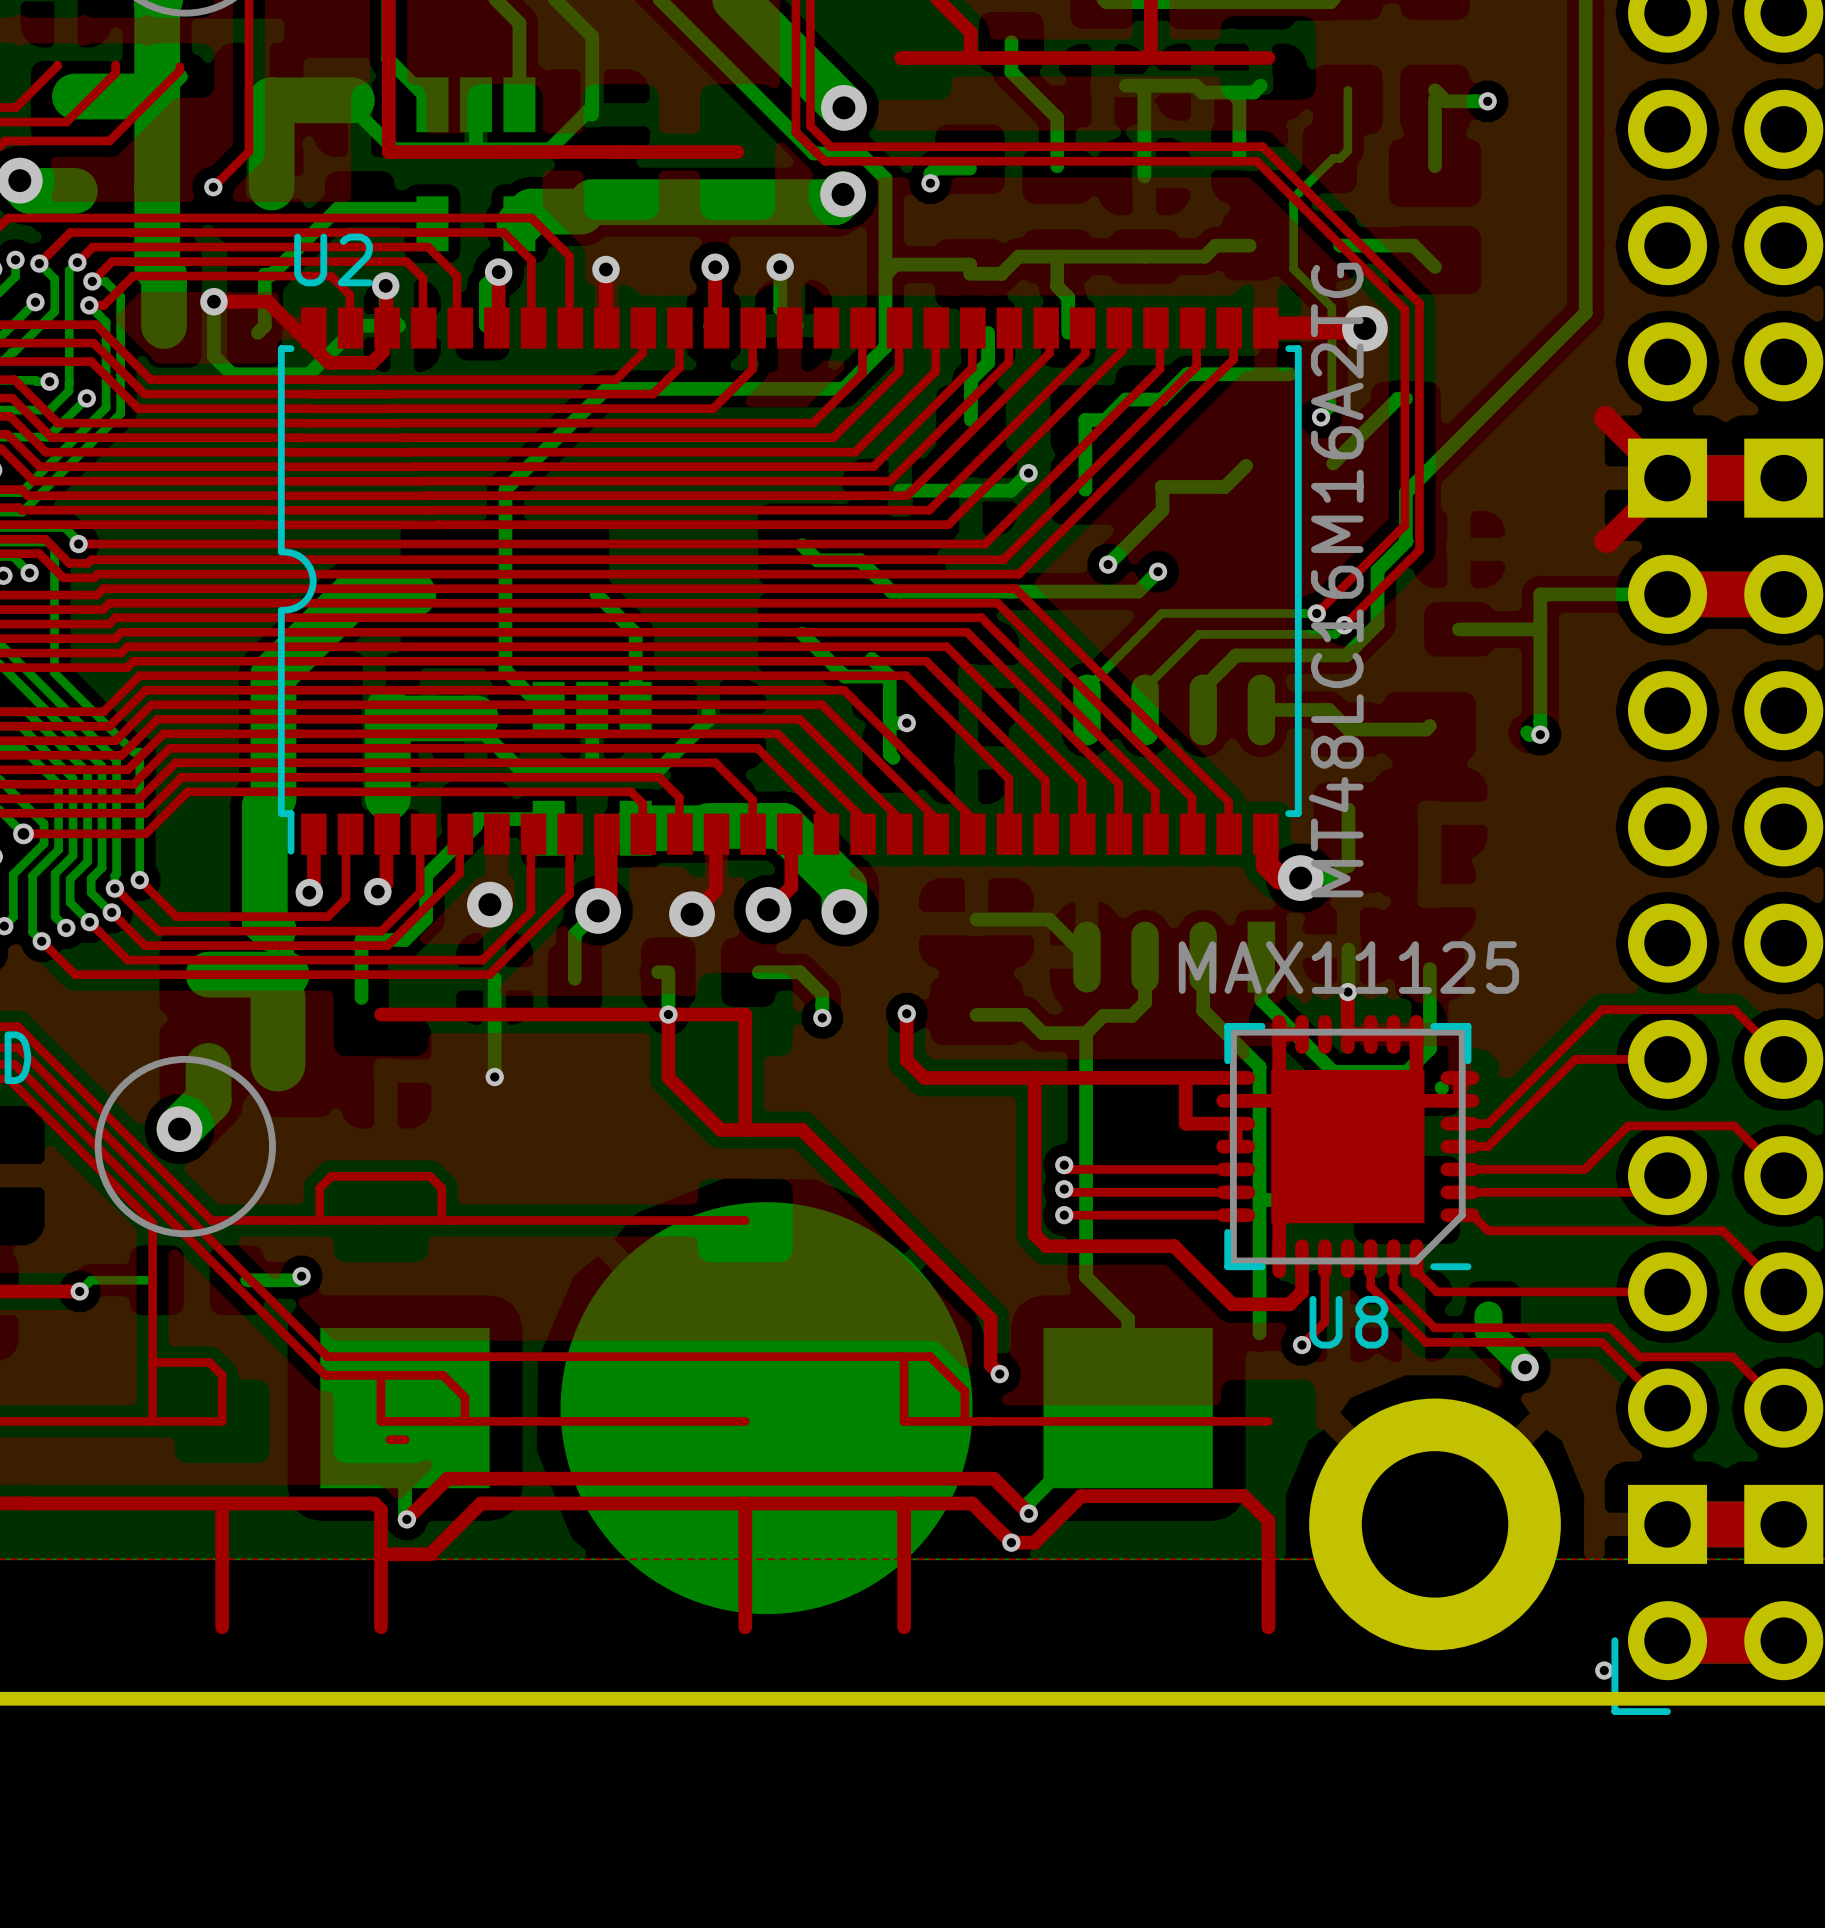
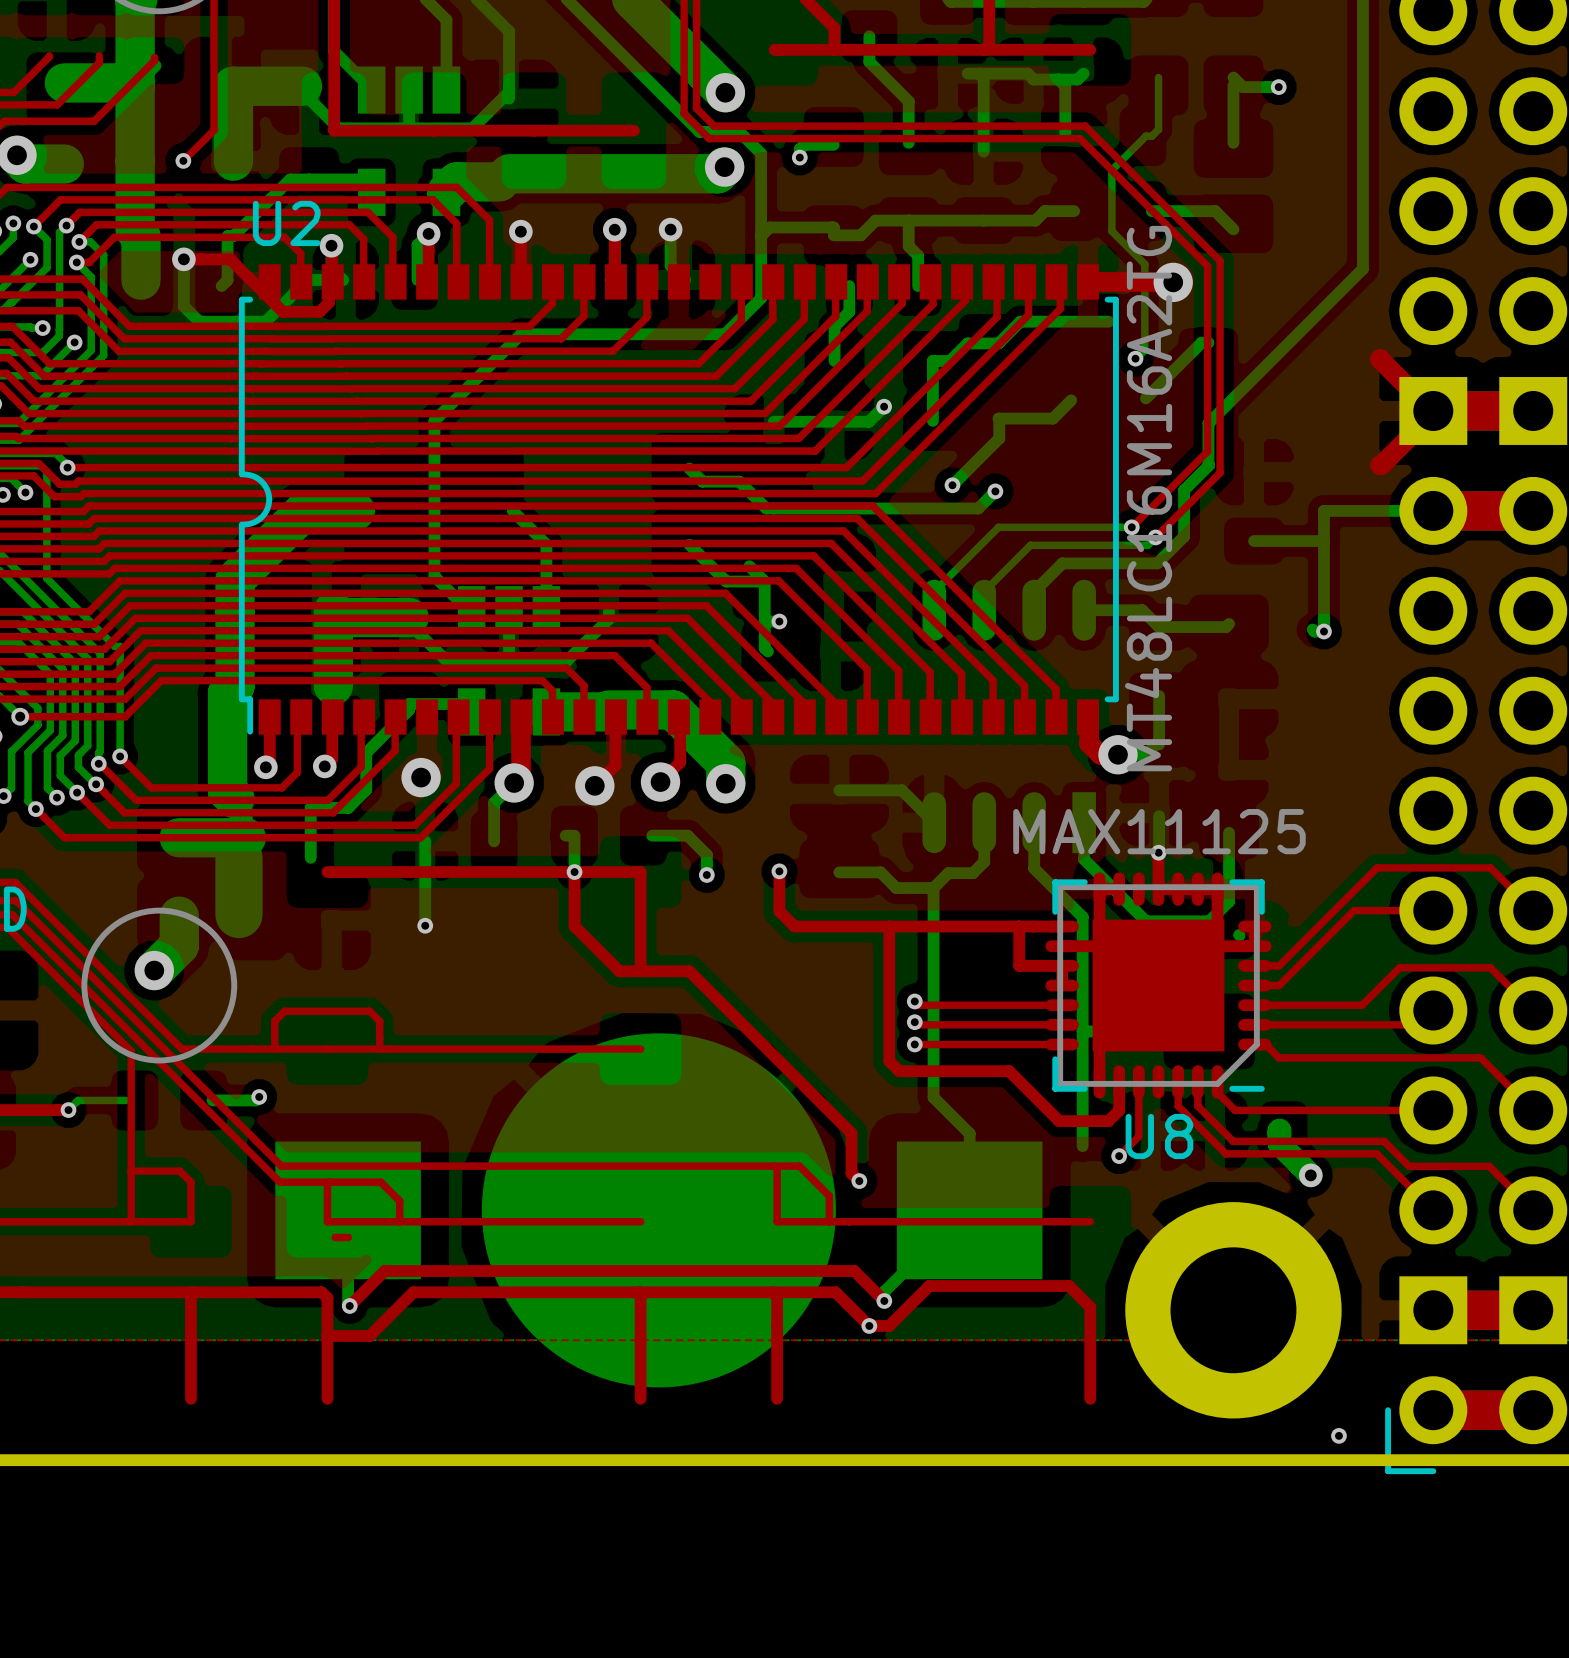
via position: (1604, 1670) -> (1338, 1435)

